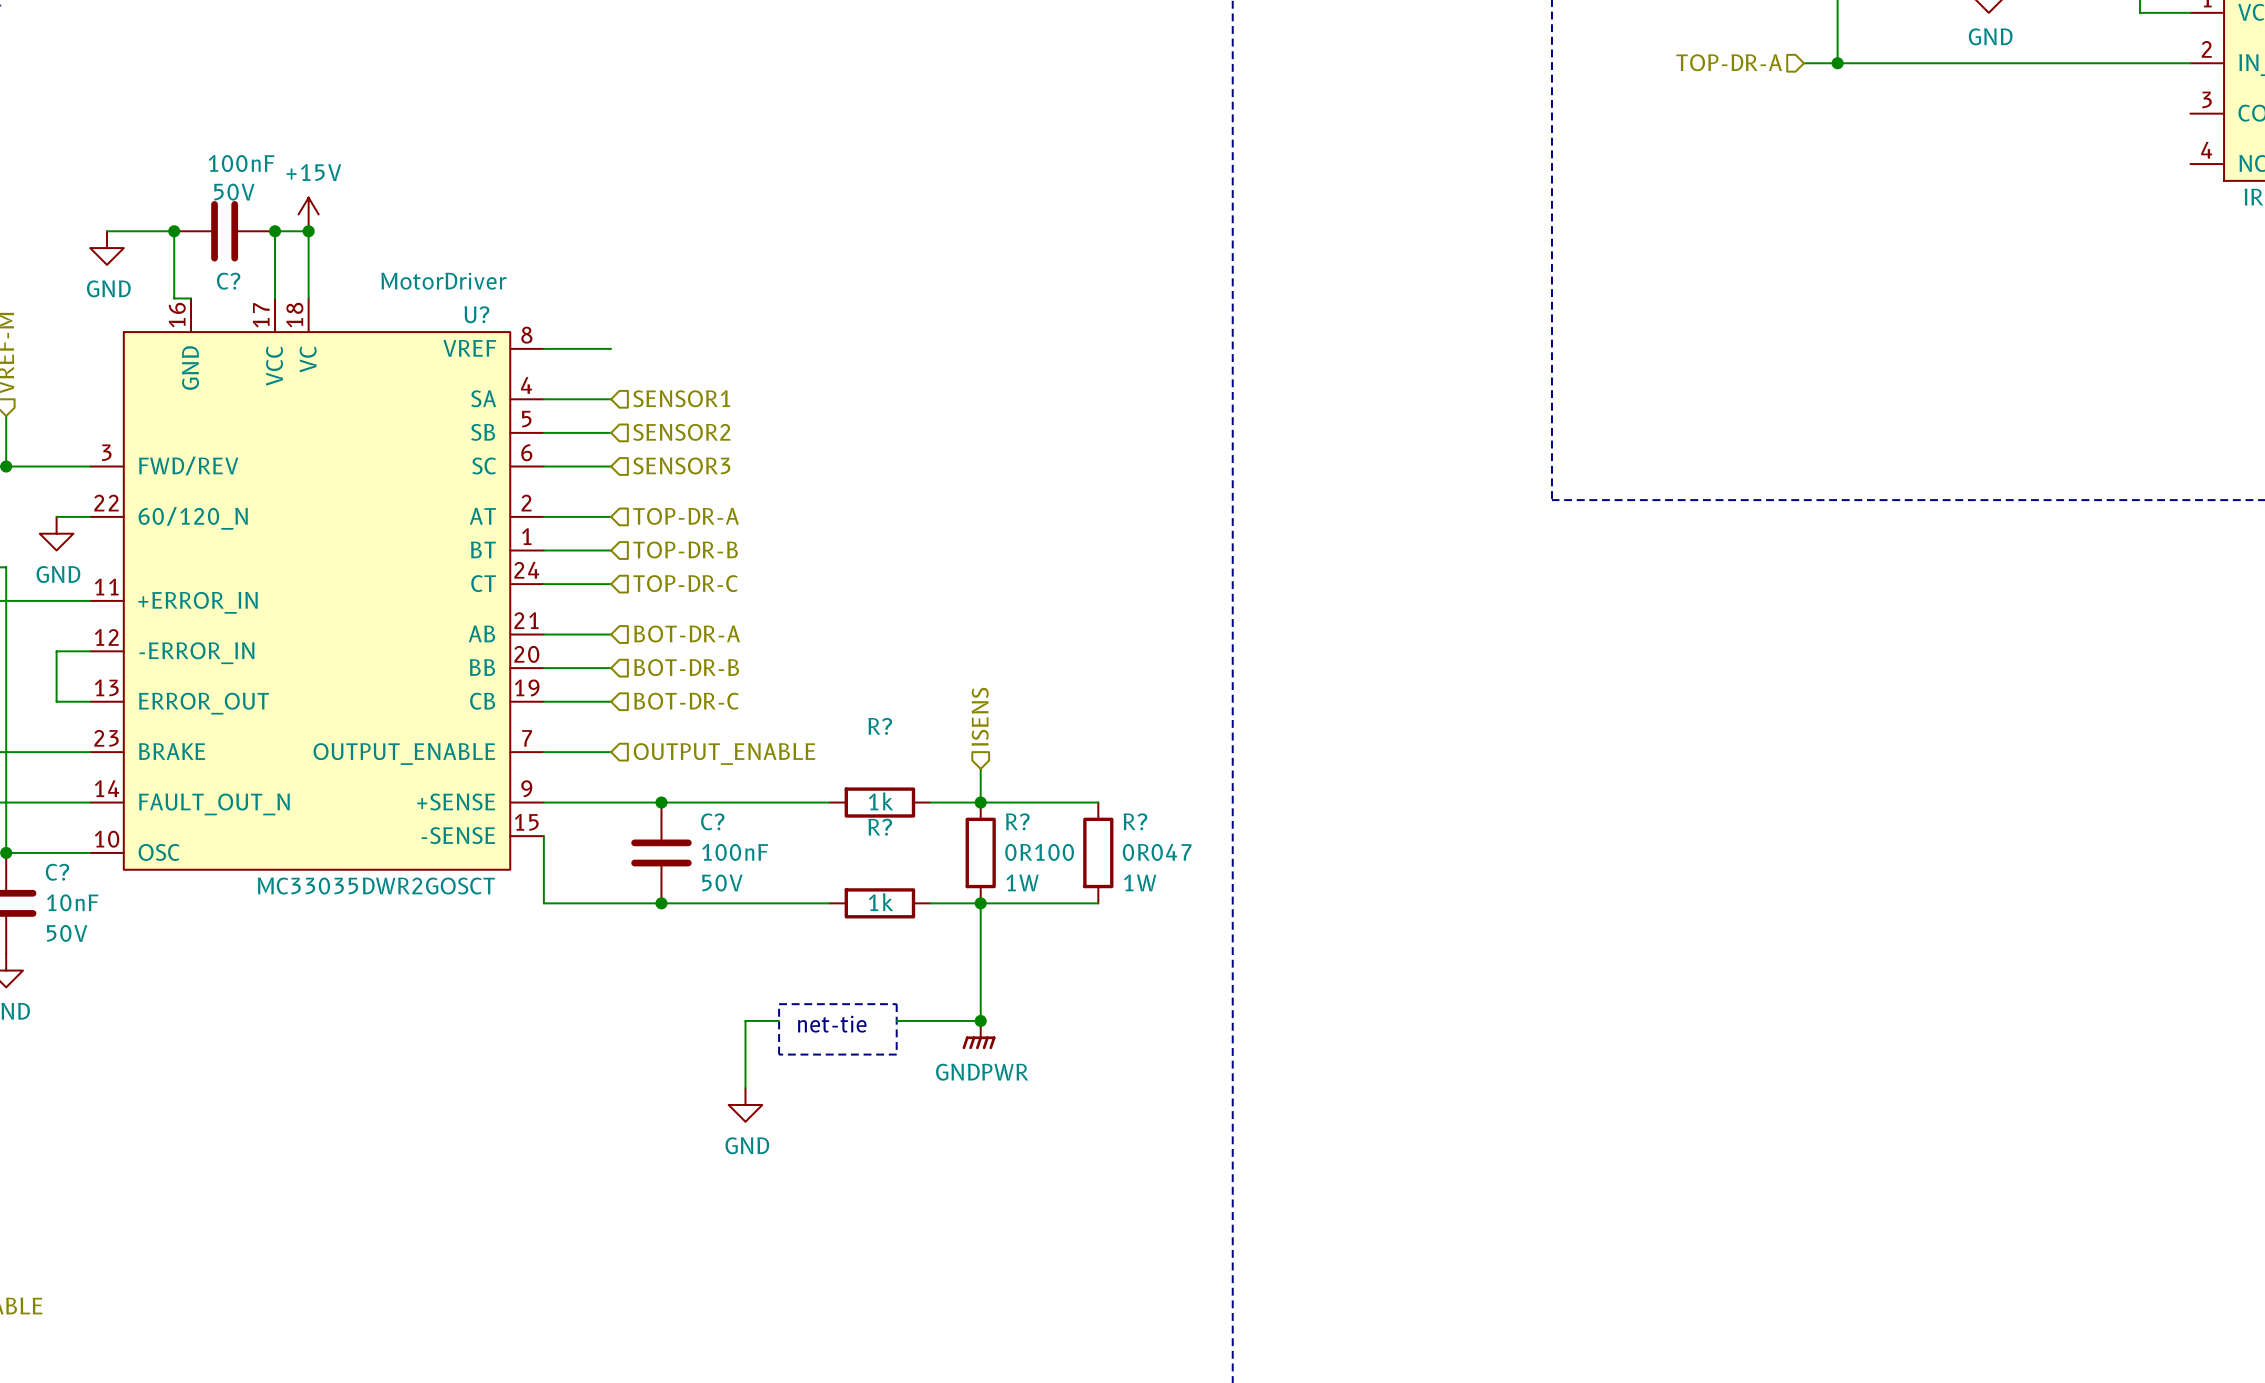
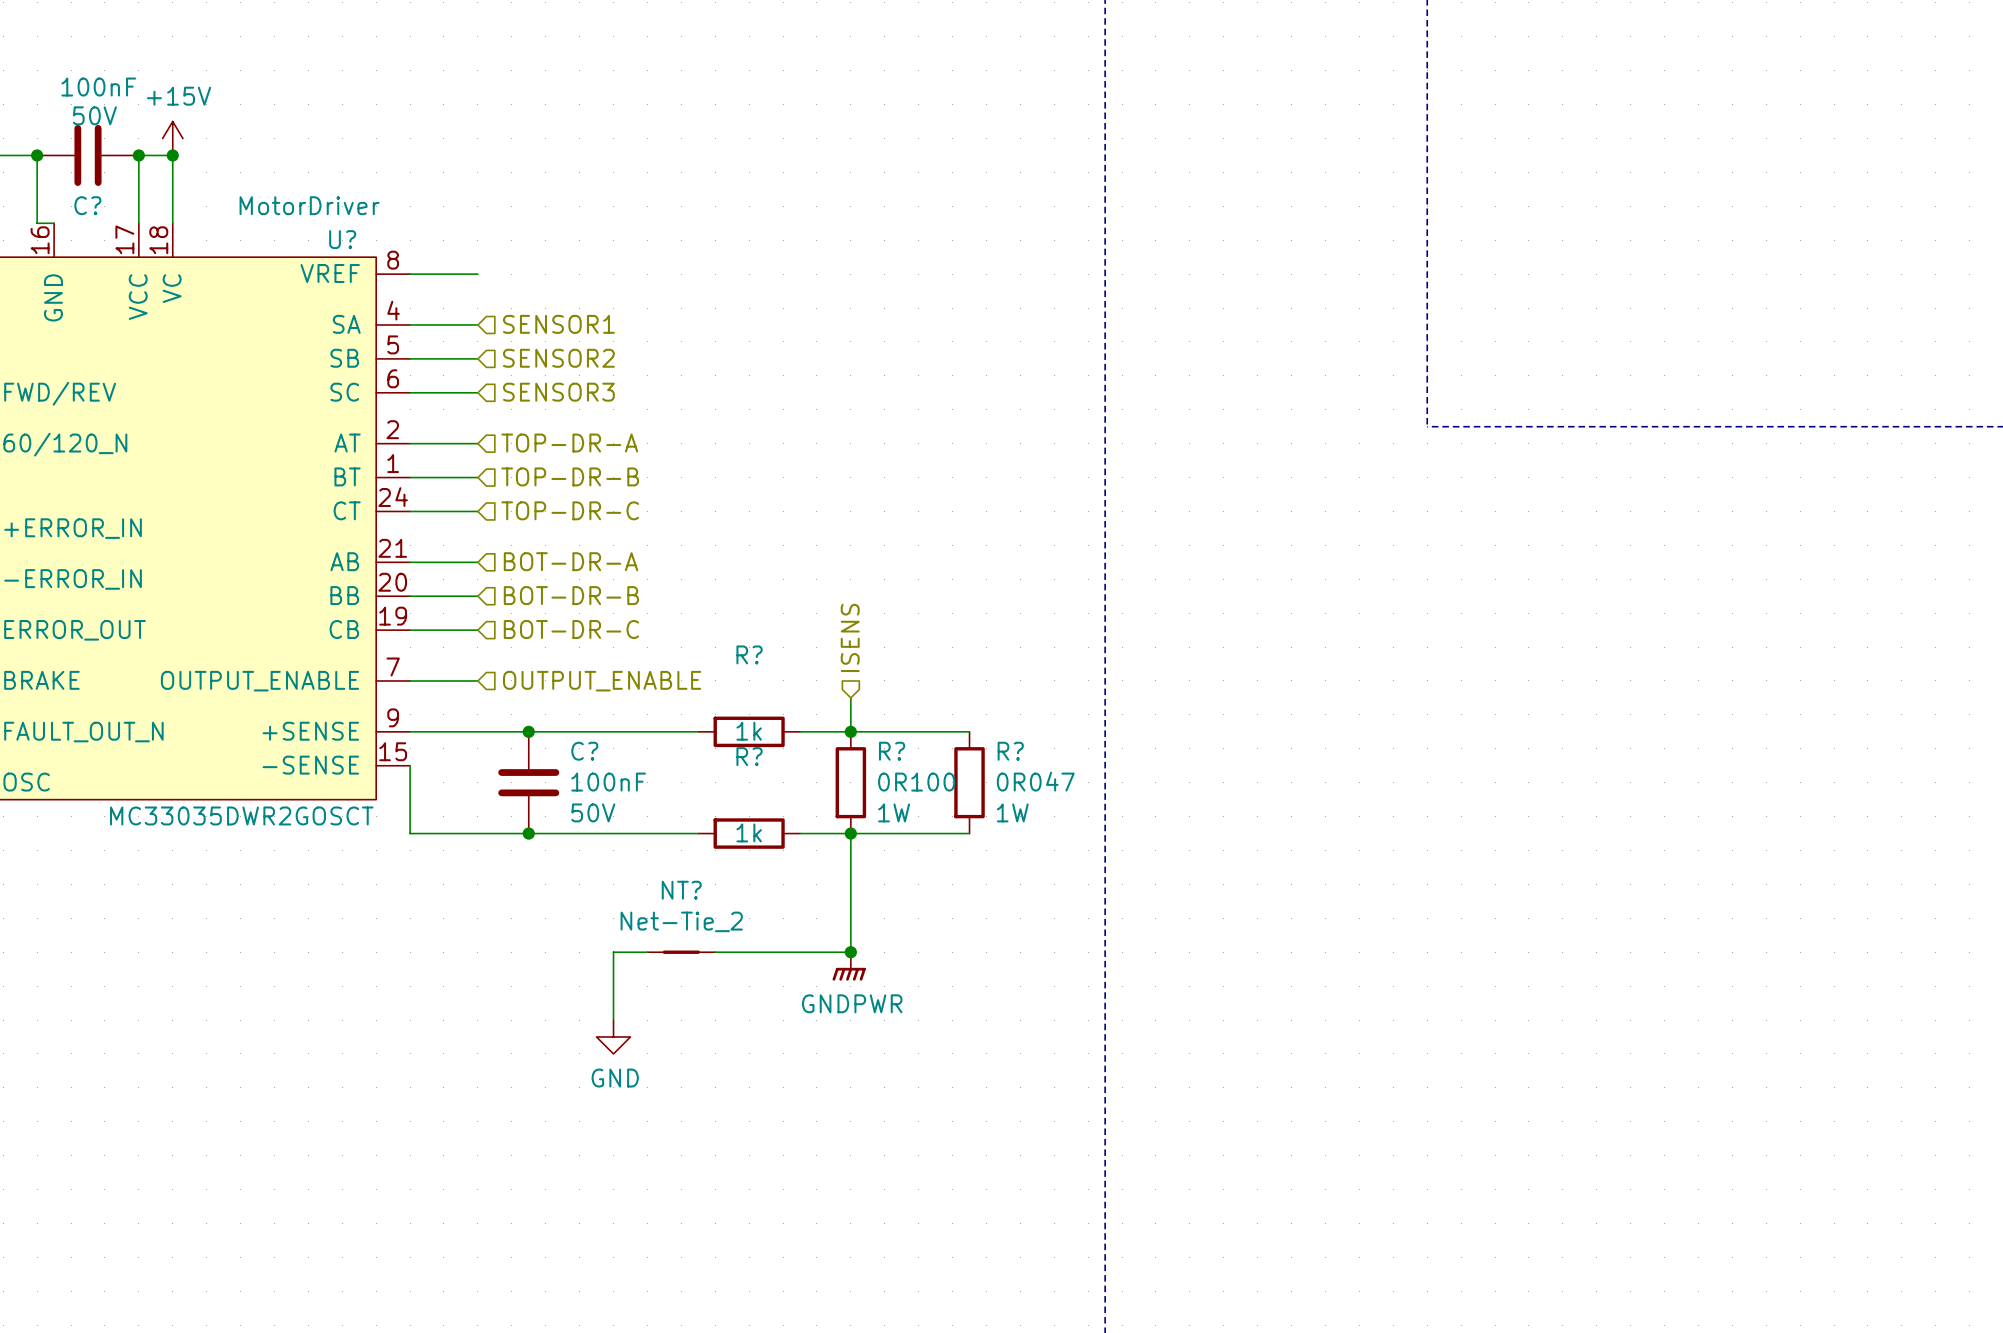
line: (779, 1004) (896, 1004) (896, 1054) (779, 1054) (779, 1004) -> none
NT?: none -> Net-Tie_2 (681, 952)
wire: none -> (715, 952) (766, 952)
text: net-tie (832, 1024) -> none

